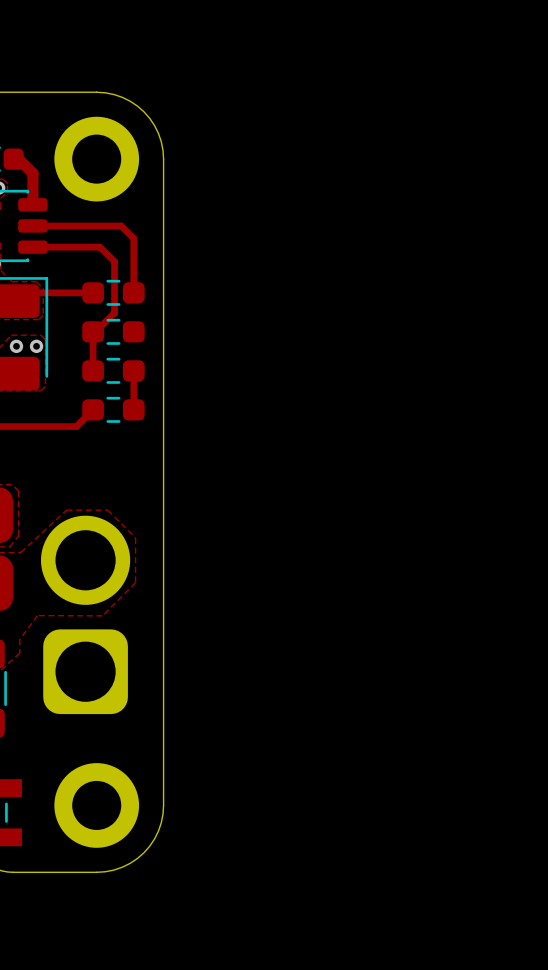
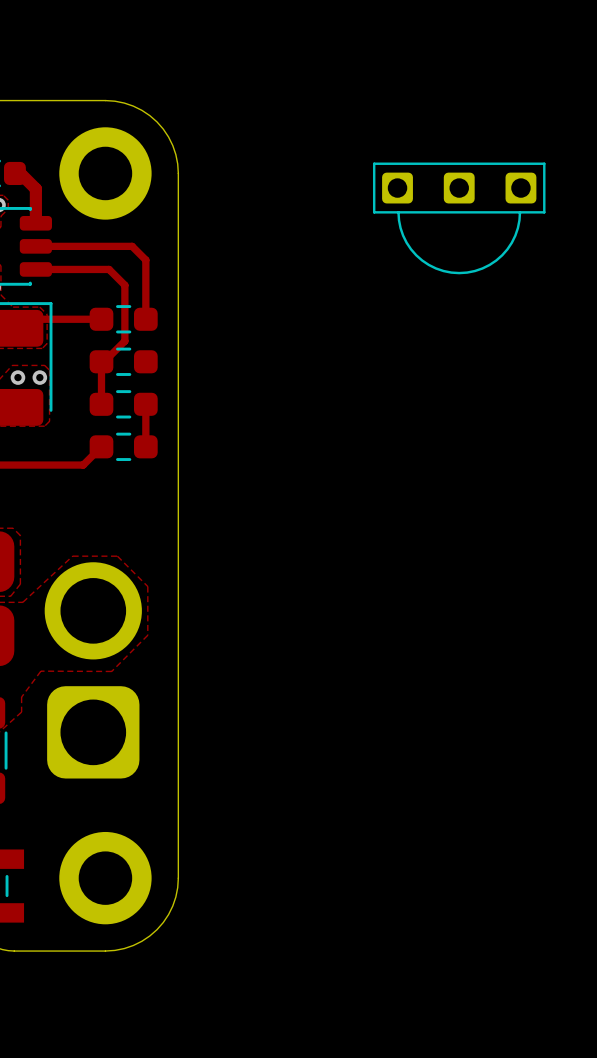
part: none -> (459, 218)

